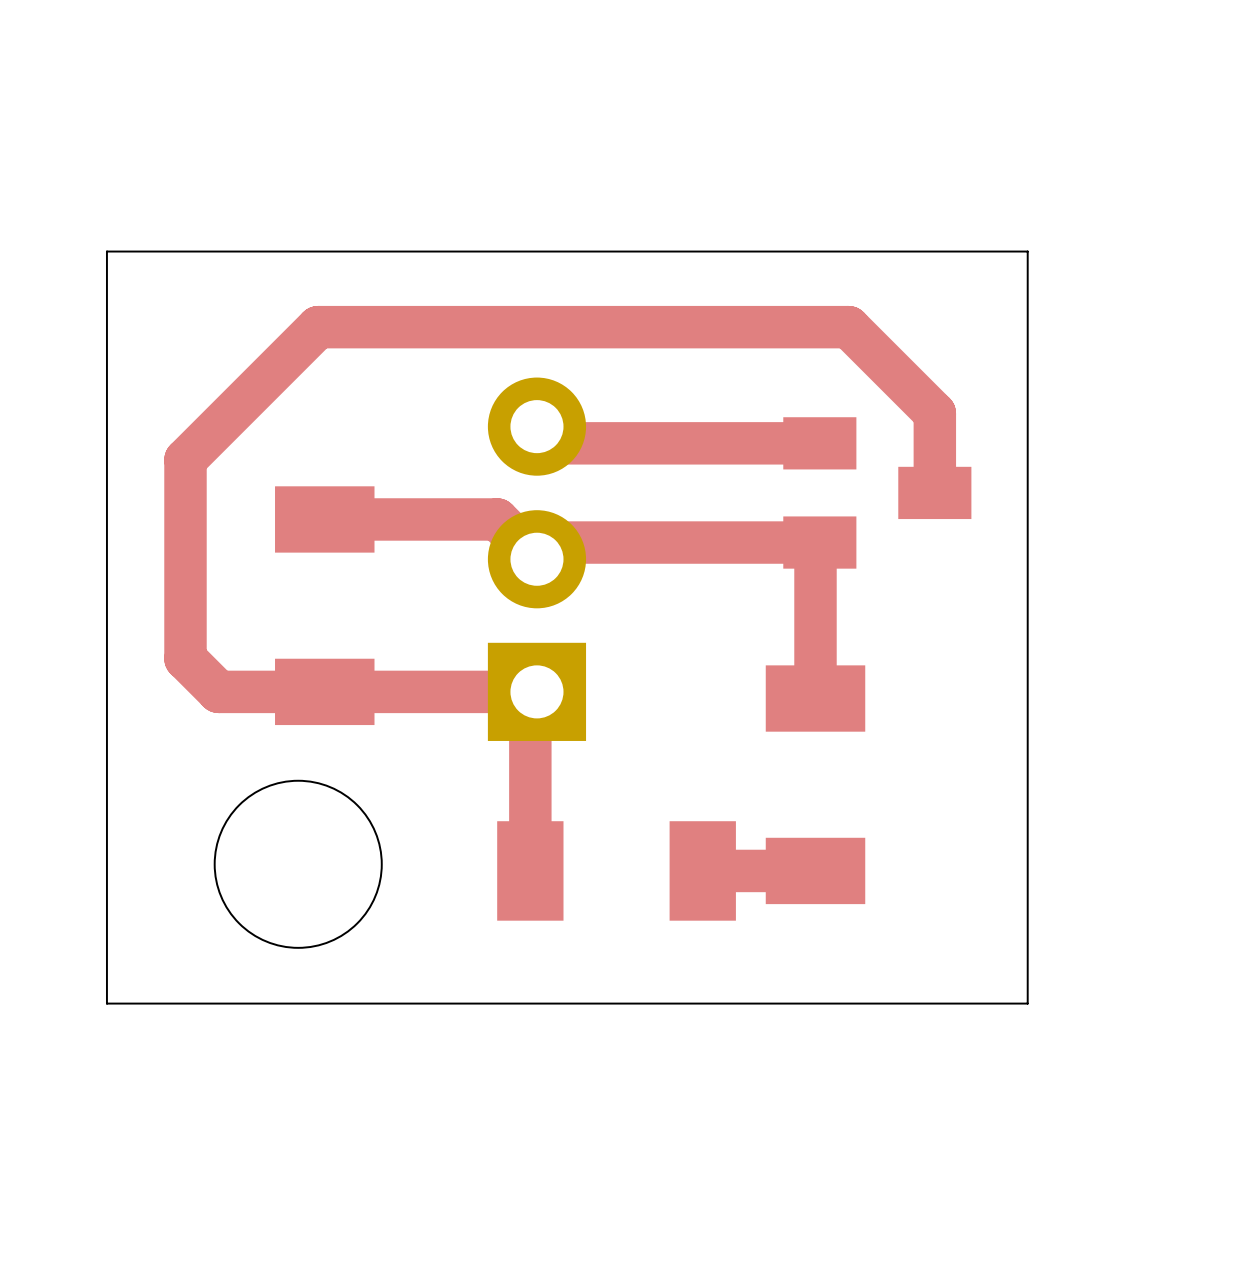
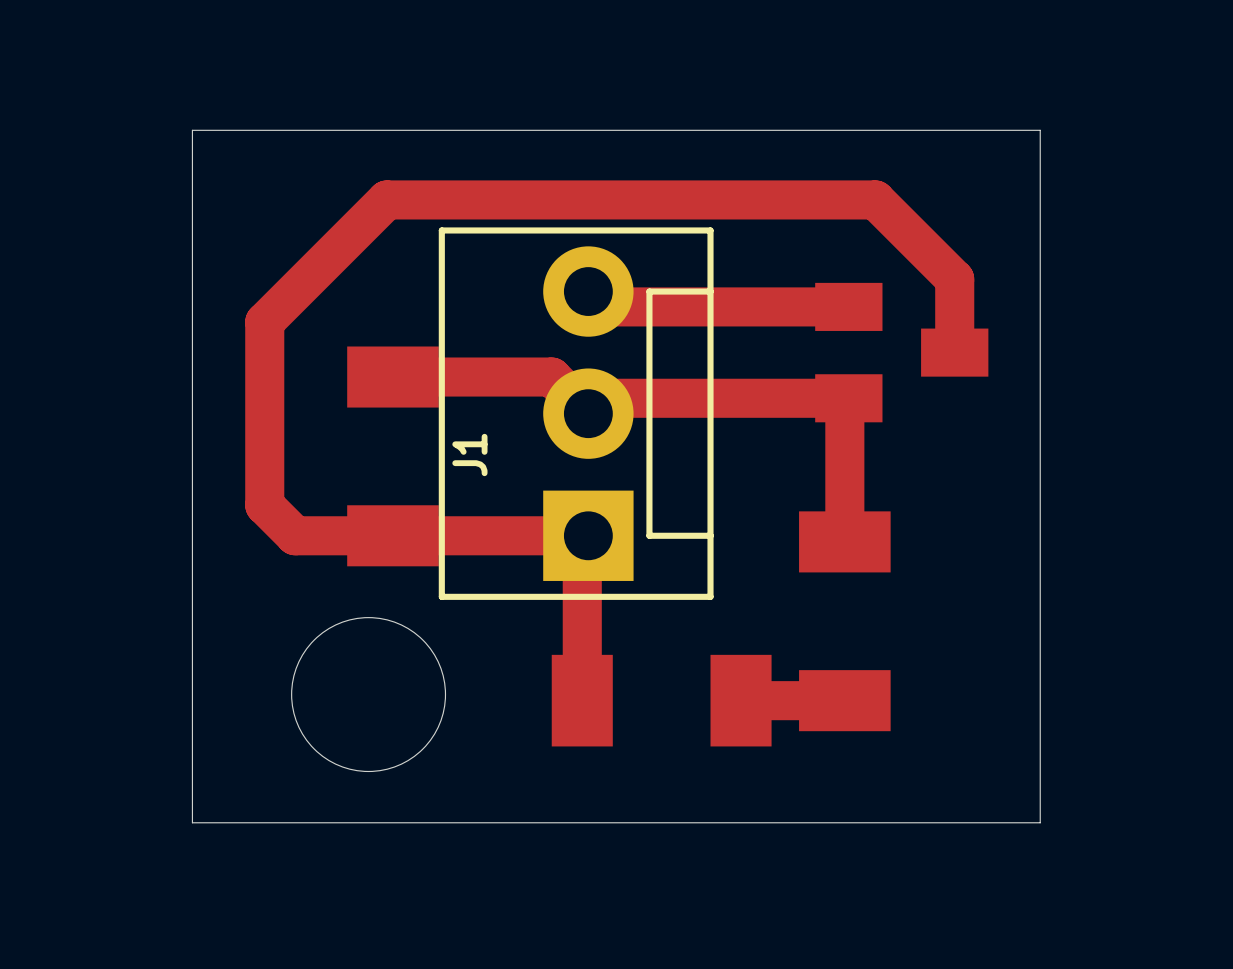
J1 side: top (536, 559) -> bottom (576, 413)

